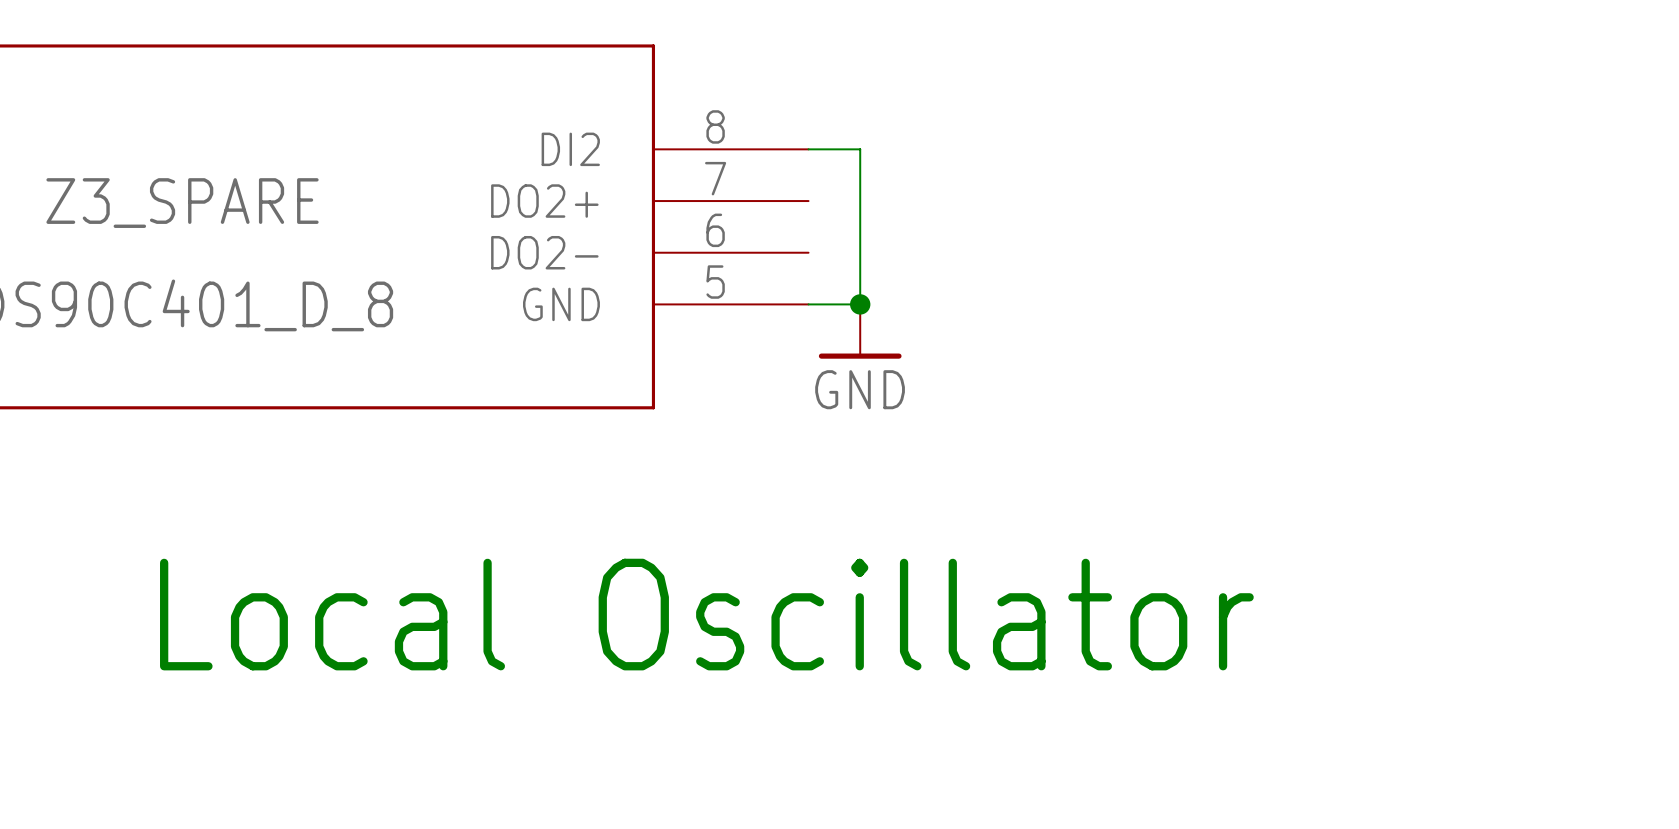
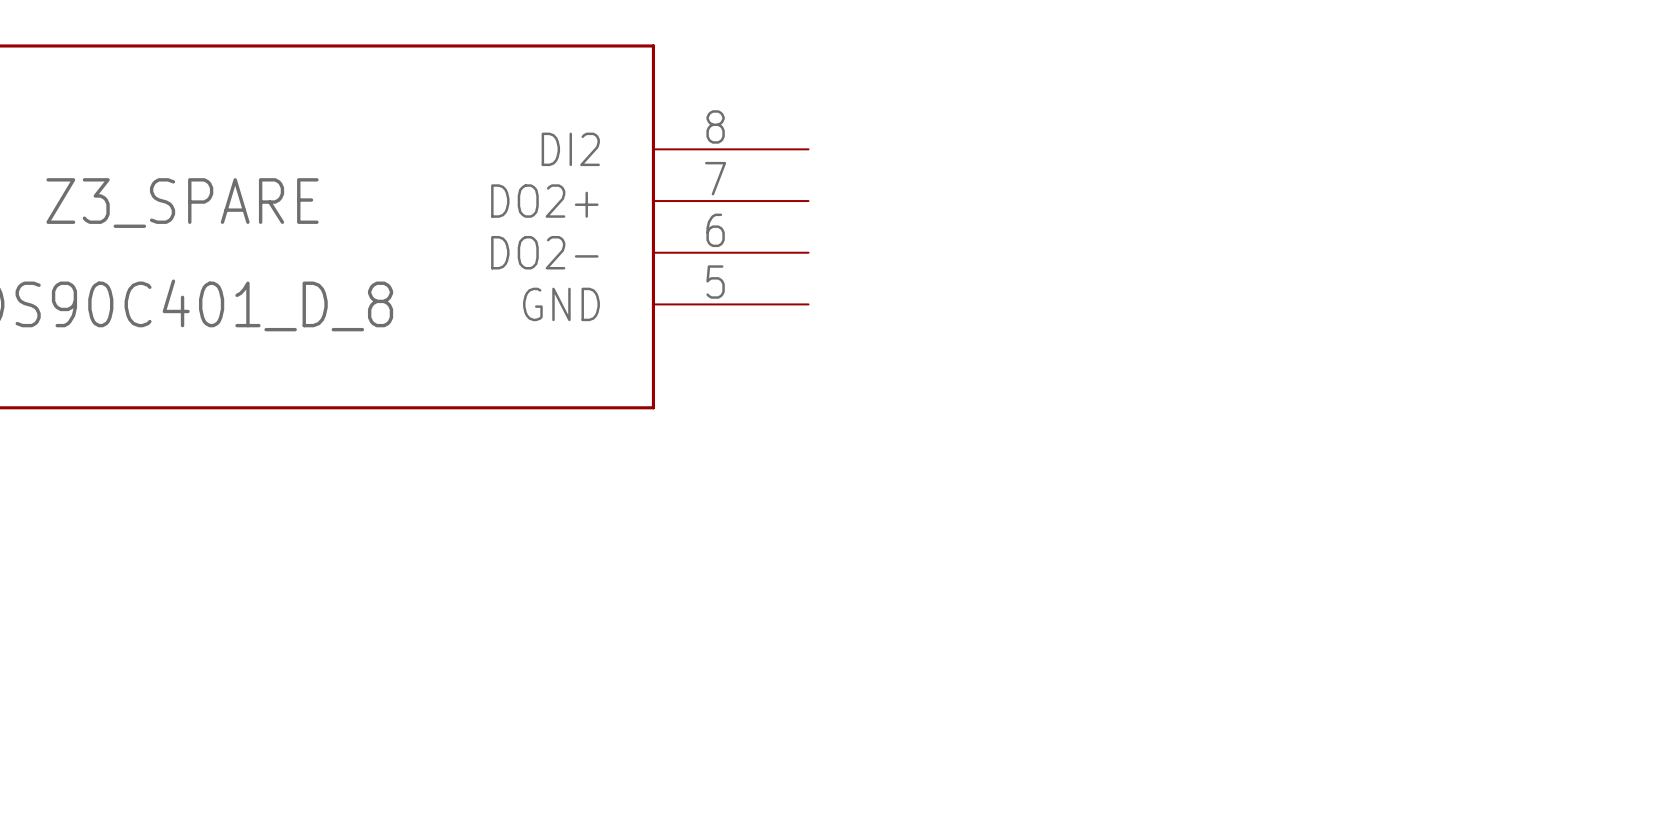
wire: (808, 149) (860, 149) (860, 304) (808, 304) -> none
junction: (860, 304) -> none
power symbol: GND (860, 331) -> none
text: Local Oscillator (706, 614) -> none

